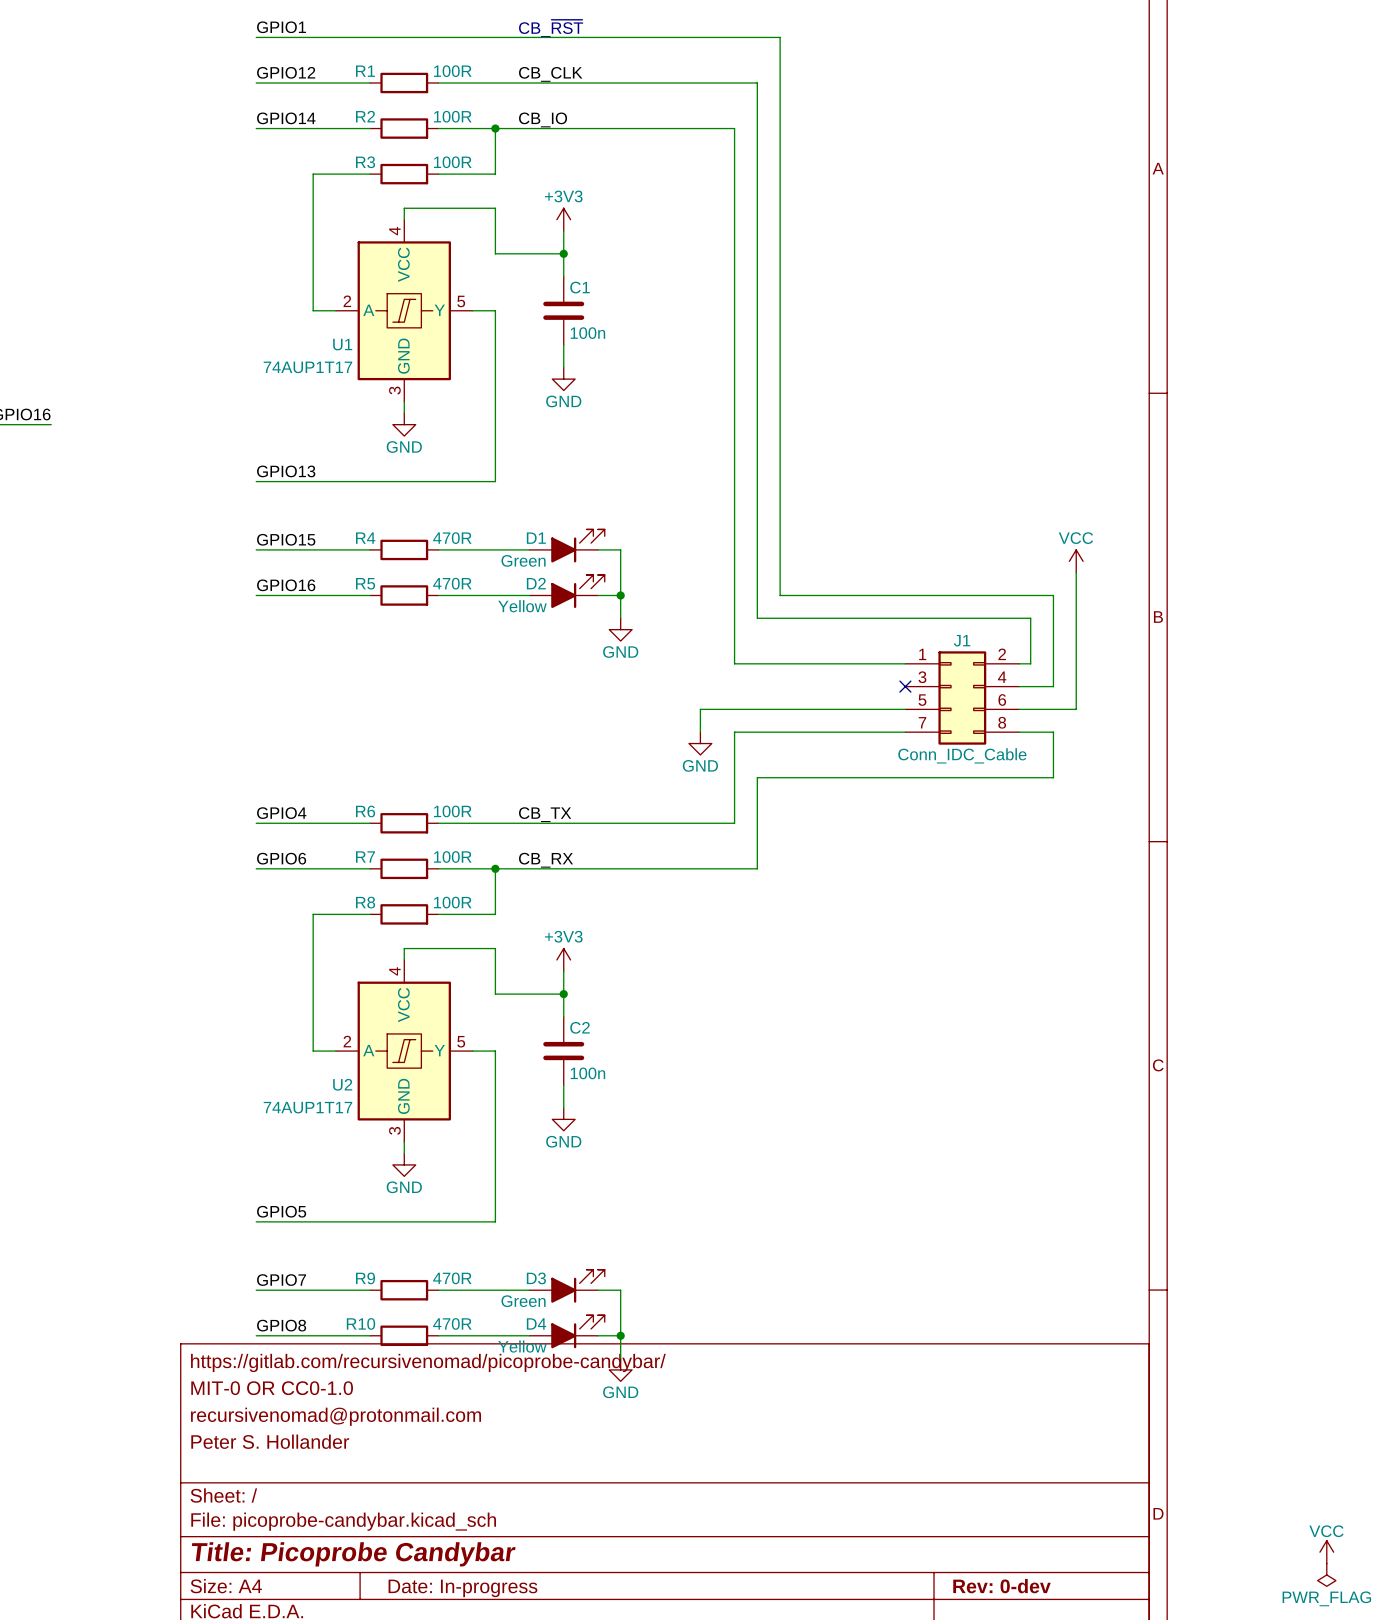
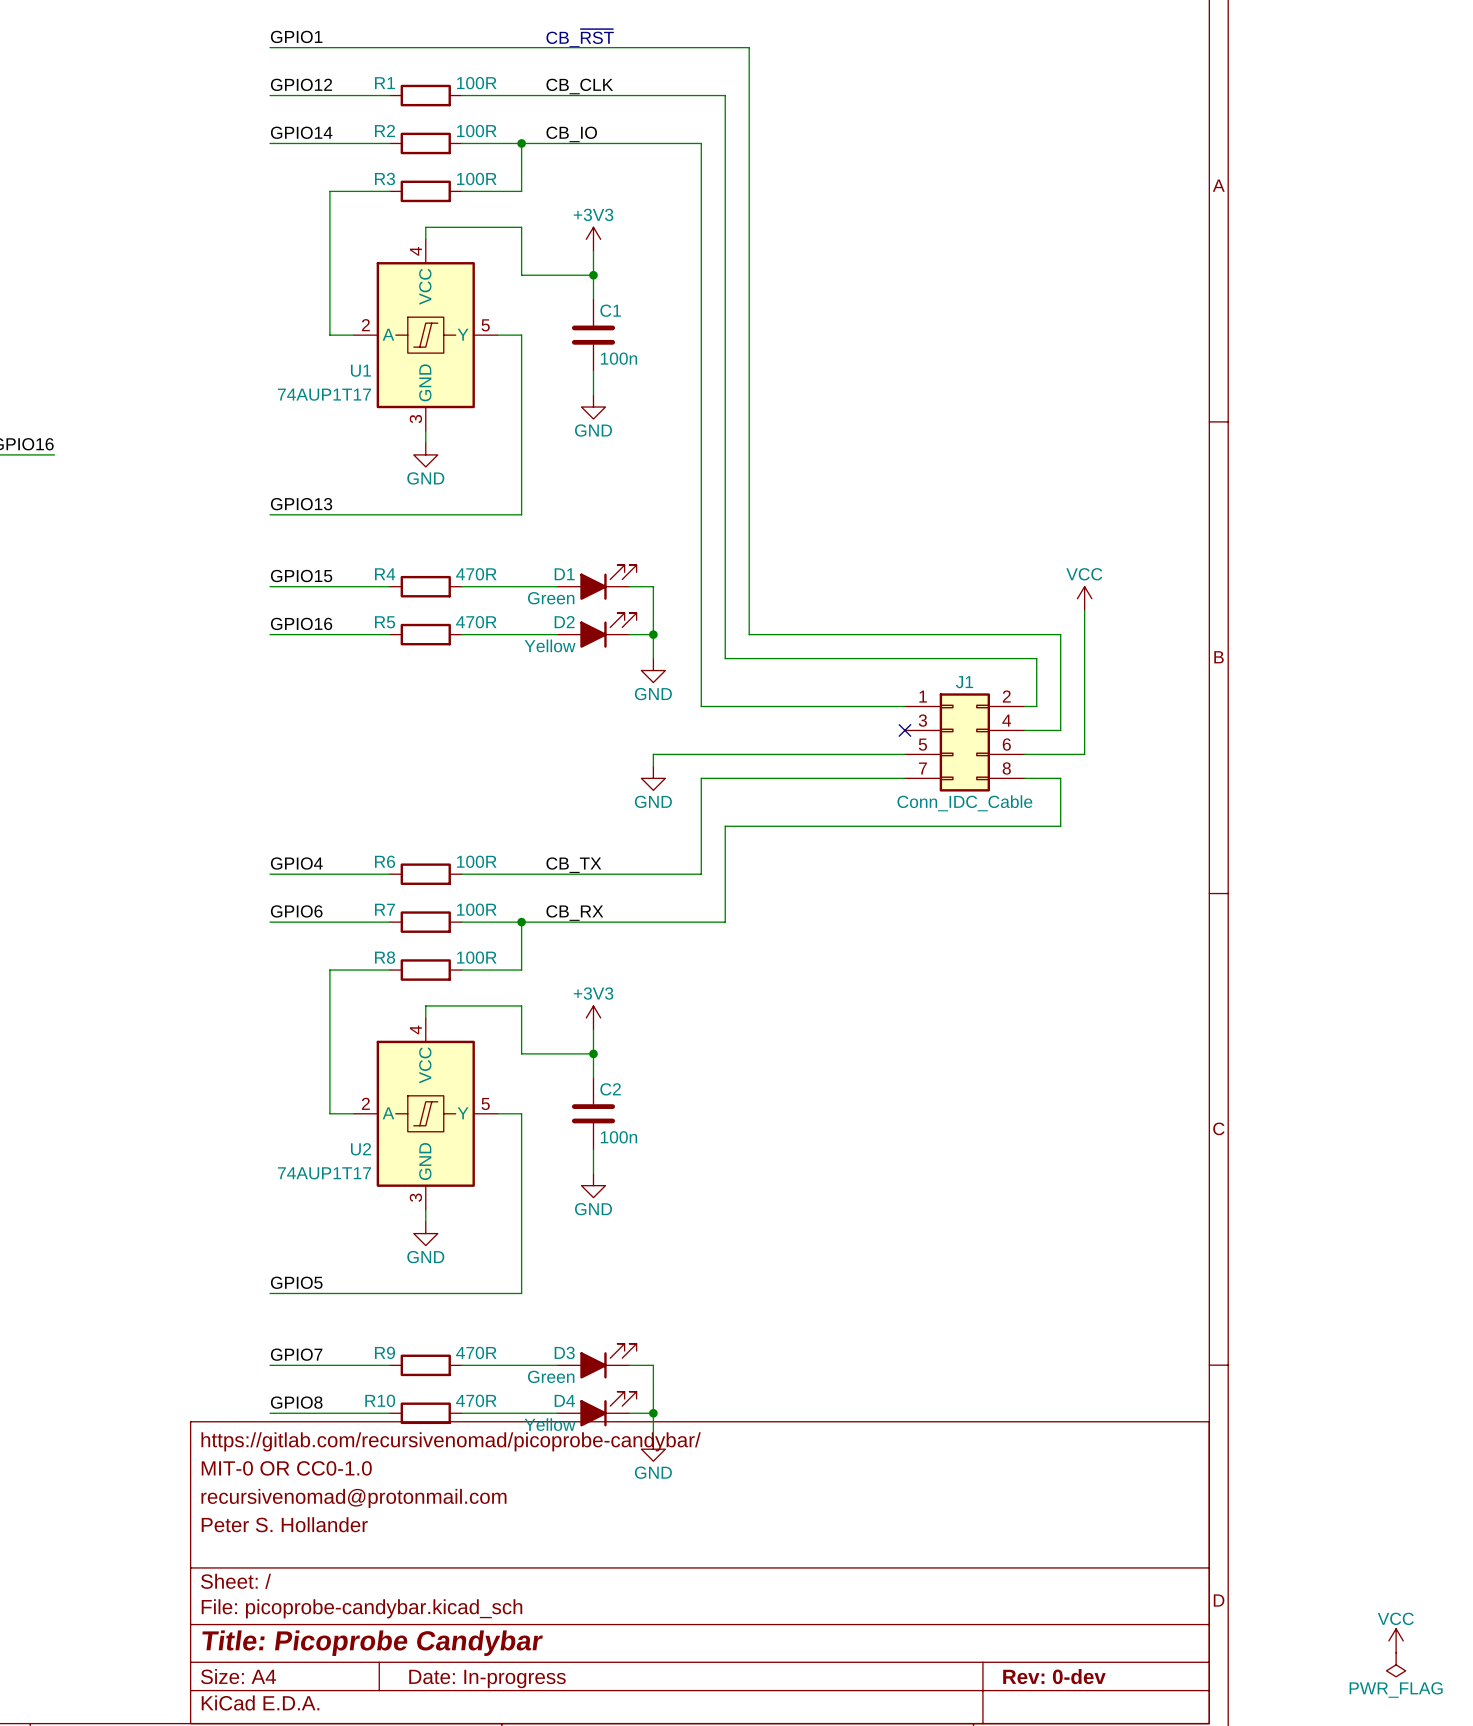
wire: (711, 37) (780, 37) (780, 595) -> (749, 47) (749, 634) (821, 634)
wire: (689, 82) (757, 82) (757, 618) -> (725, 95) (725, 658) (797, 658)
wire: (666, 128) (734, 128) (734, 663) -> (701, 143) (701, 706) (773, 706)
power symbol position: VCC (1076, 561) -> VCC (1084, 598)
wire: (1076, 572) (1076, 709) (1030, 709) -> none
wire: (1007, 595) (1053, 595) (1053, 686) (1019, 686) -> (1060, 634) (1060, 730) (1024, 730)
wire: (985, 618) (1030, 618) -> (1084, 610) (1084, 658)
wire: none -> (1036, 658) (1036, 706) (1024, 706)
wire: (1019, 663) (1030, 663) -> (1084, 754) (1084, 706)
no-connect mark position: (905, 686) -> (904, 730)
J1 position: (962, 697) -> (964, 742)
wire: (700, 709) (700, 732) -> (737, 754) (653, 754) (653, 766)
wire: (734, 732) (734, 823) (666, 823) -> (773, 778) (701, 778) (701, 874)
wire: (1019, 732) (1053, 732) (1053, 777) (1007, 777) -> (1024, 778) (1060, 778) (1060, 826)
power symbol position: GND (700, 743) -> GND (653, 778)
wire: (757, 777) (757, 868) (689, 868) -> (797, 826) (725, 826) (725, 922)

